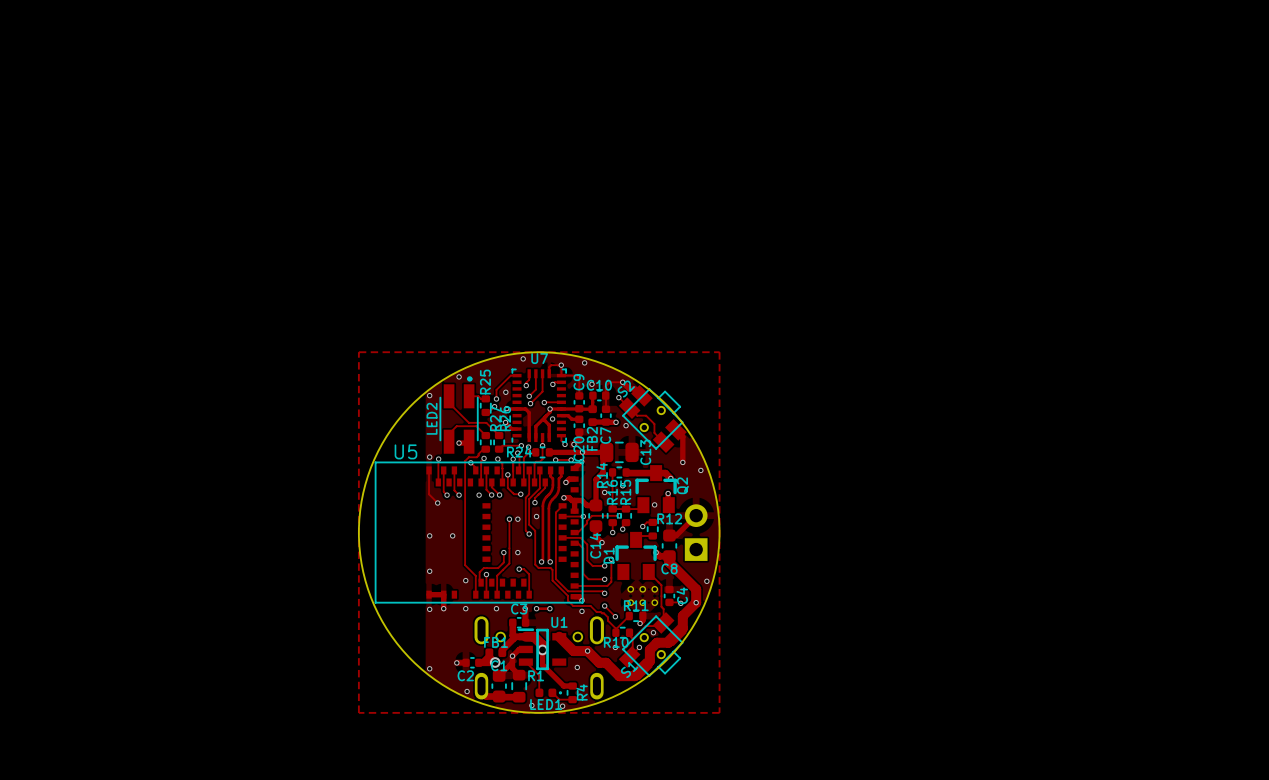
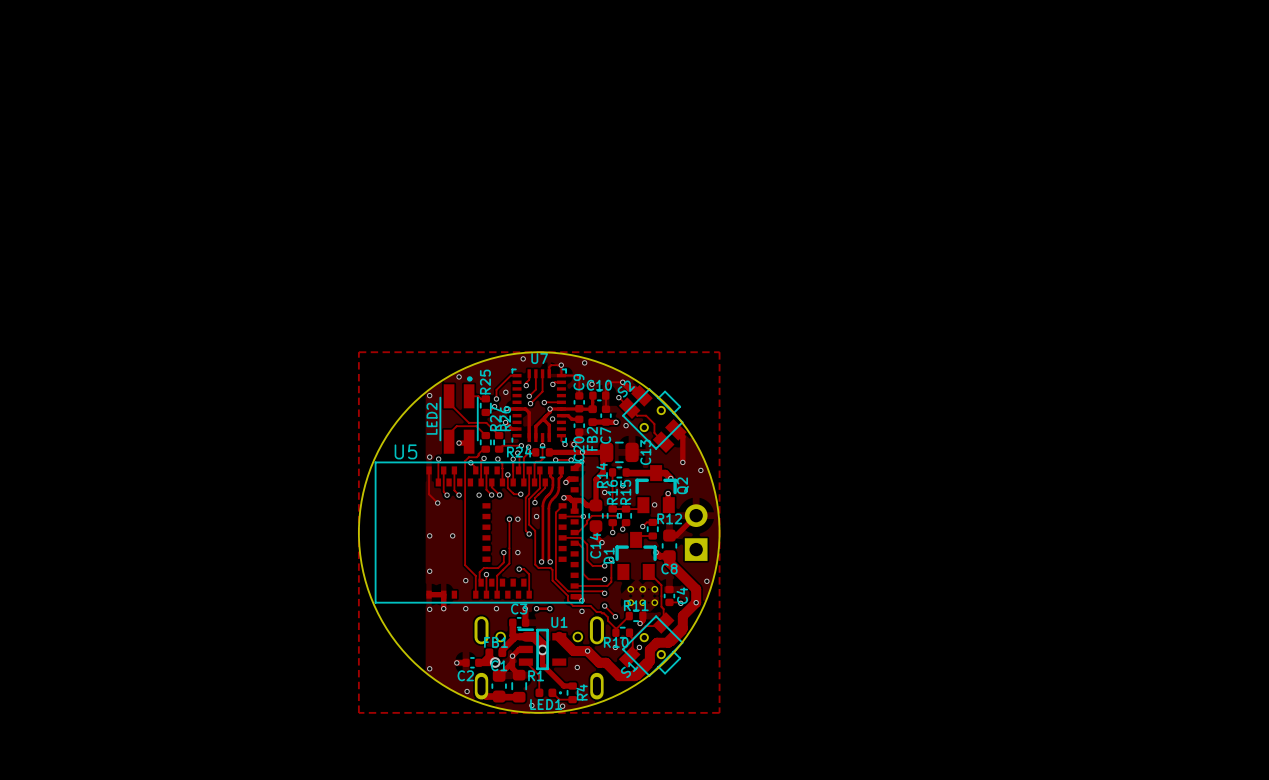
via: (653, 632) -> none

